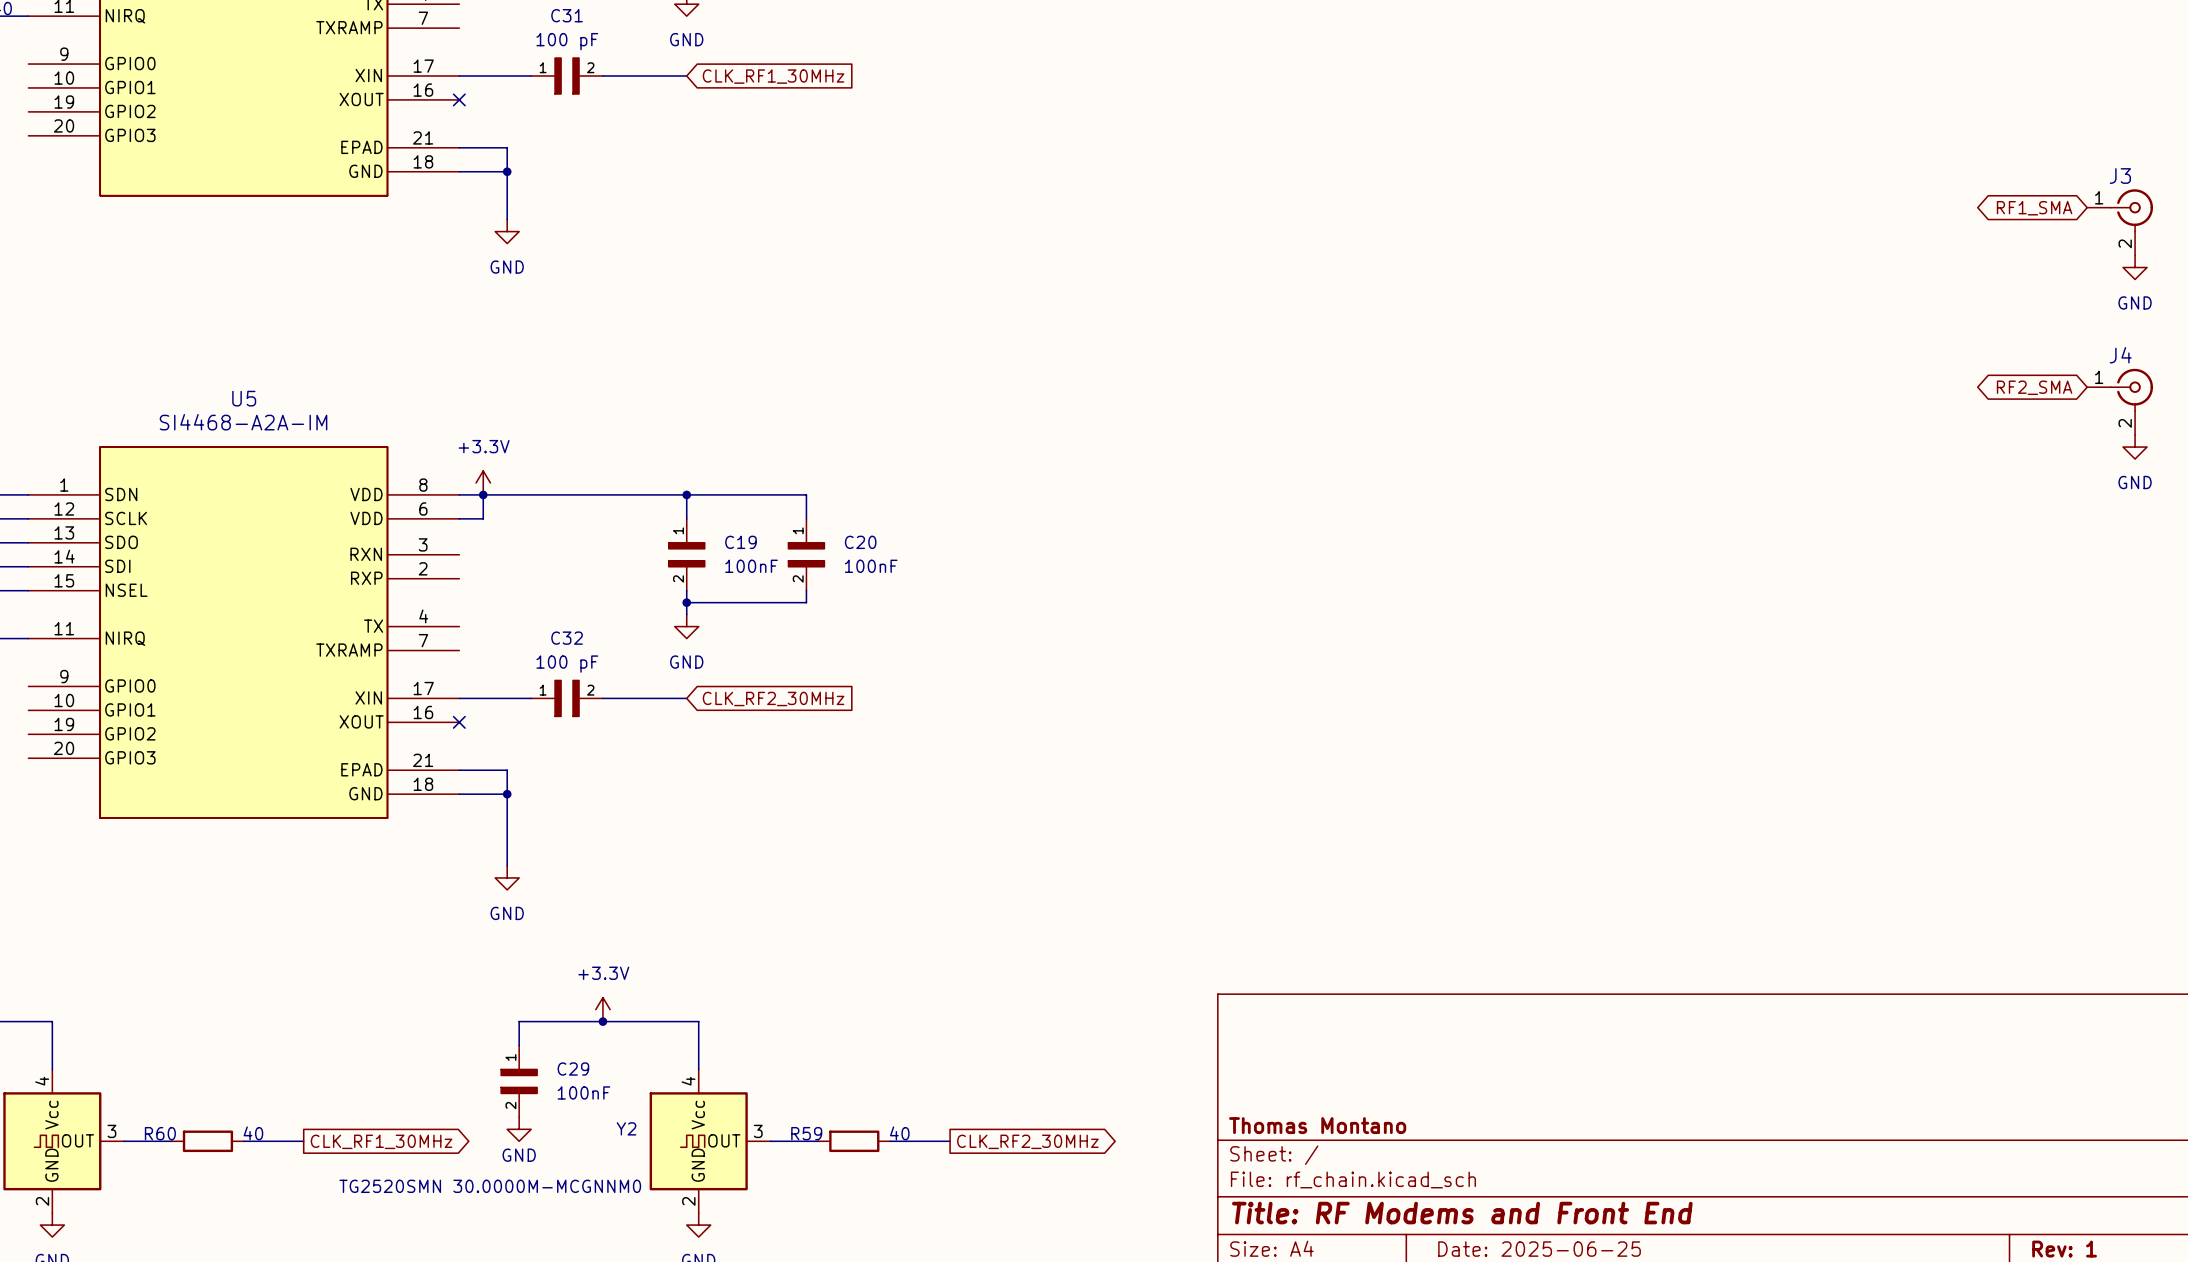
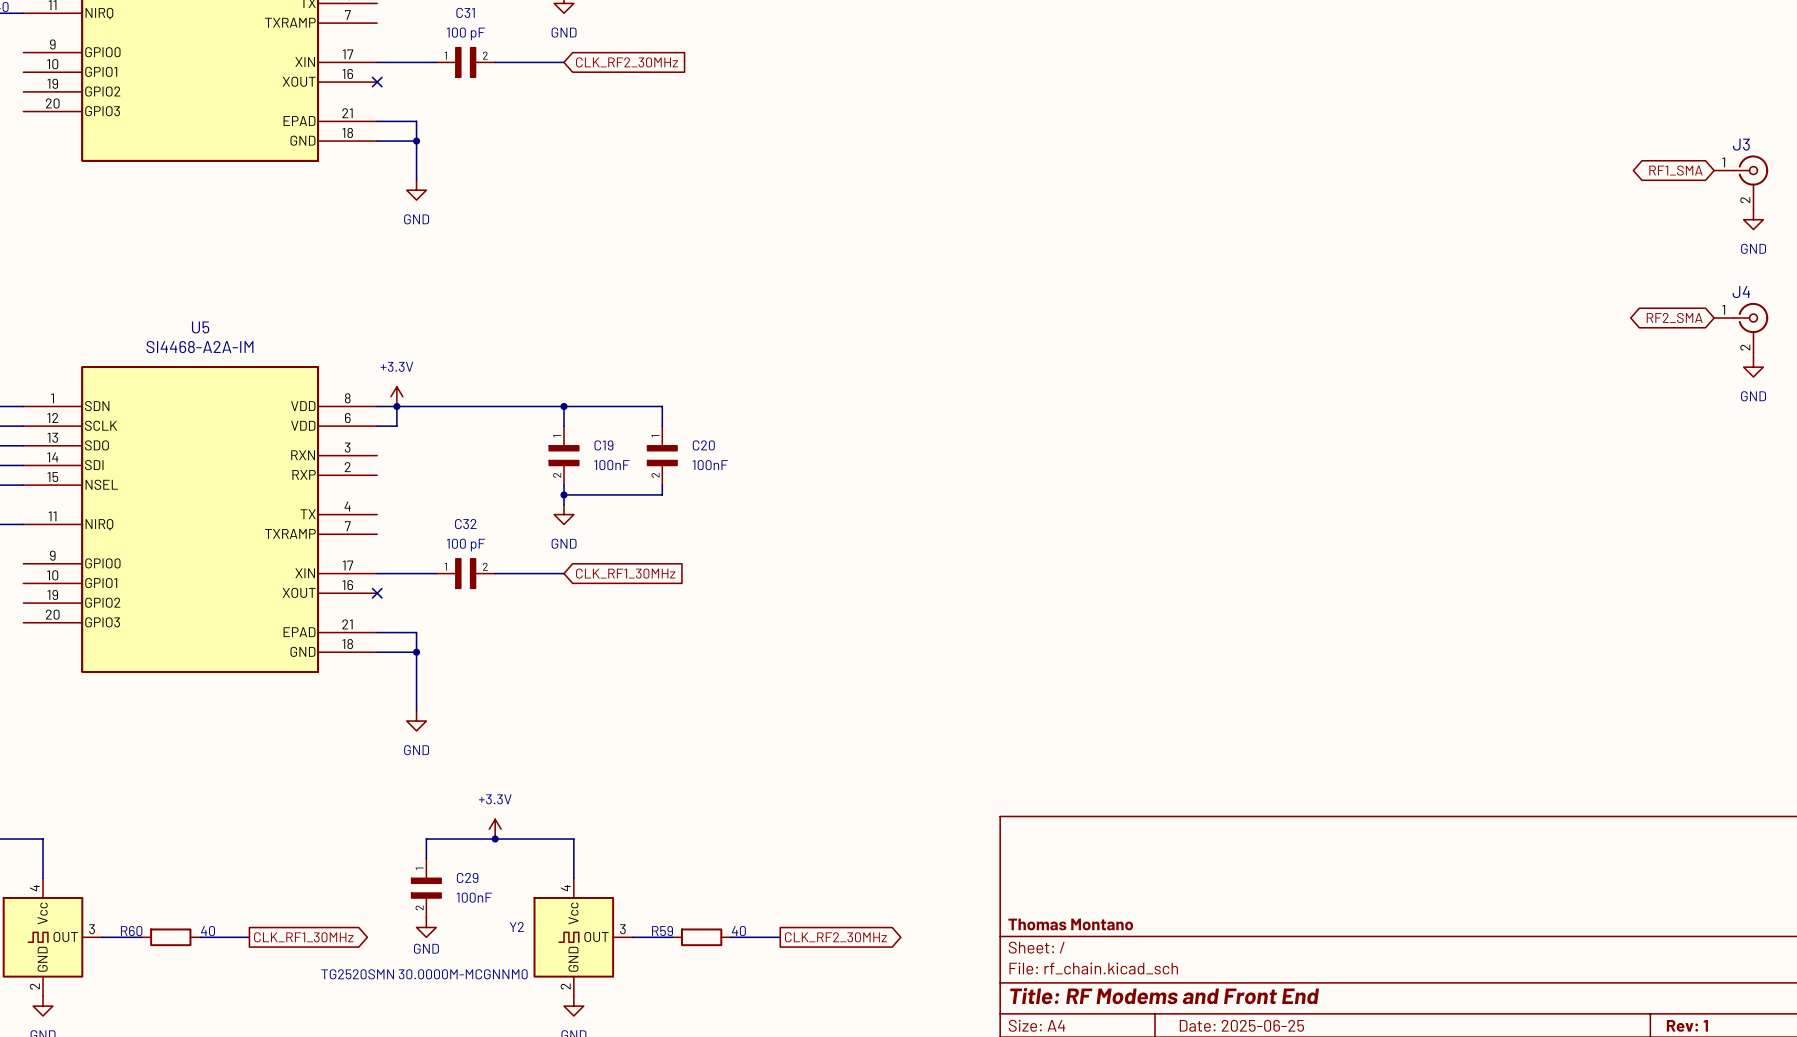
global label: CLK_RF1_30MHz (773, 76) -> CLK_RF2_30MHz (627, 62)
global label: CLK_RF2_30MHz (773, 698) -> CLK_RF1_30MHz (625, 573)

